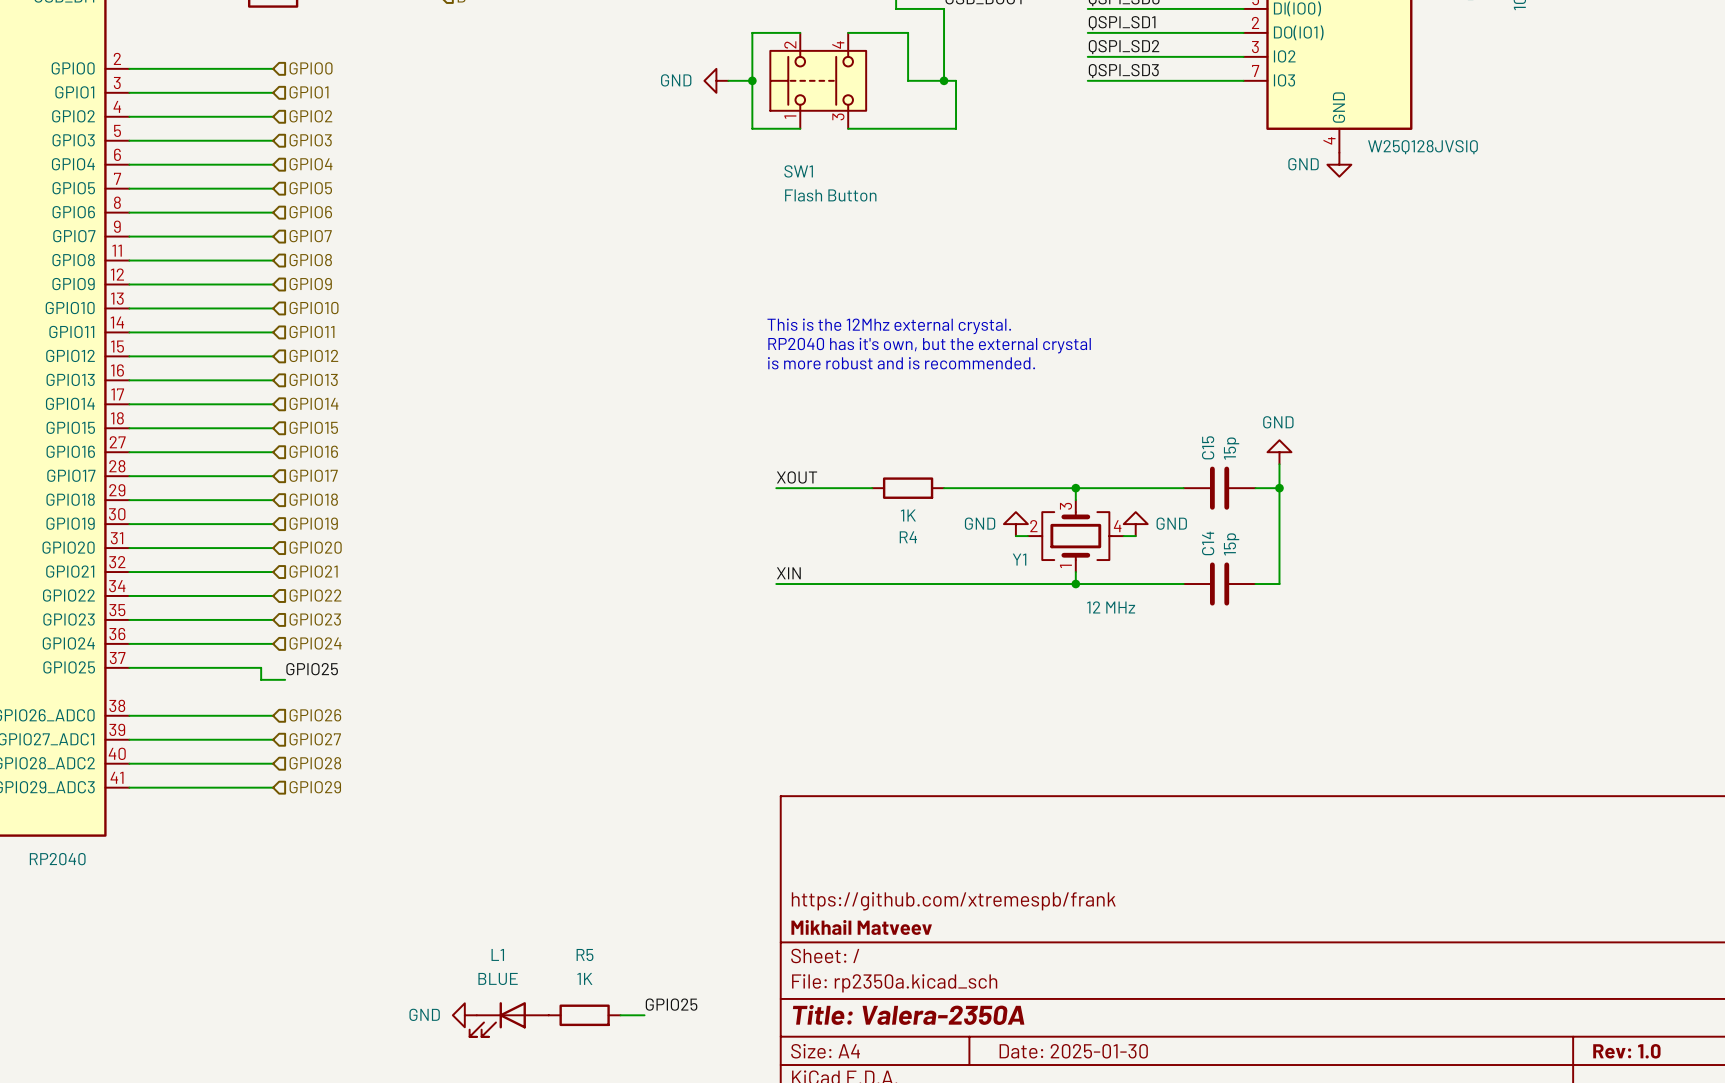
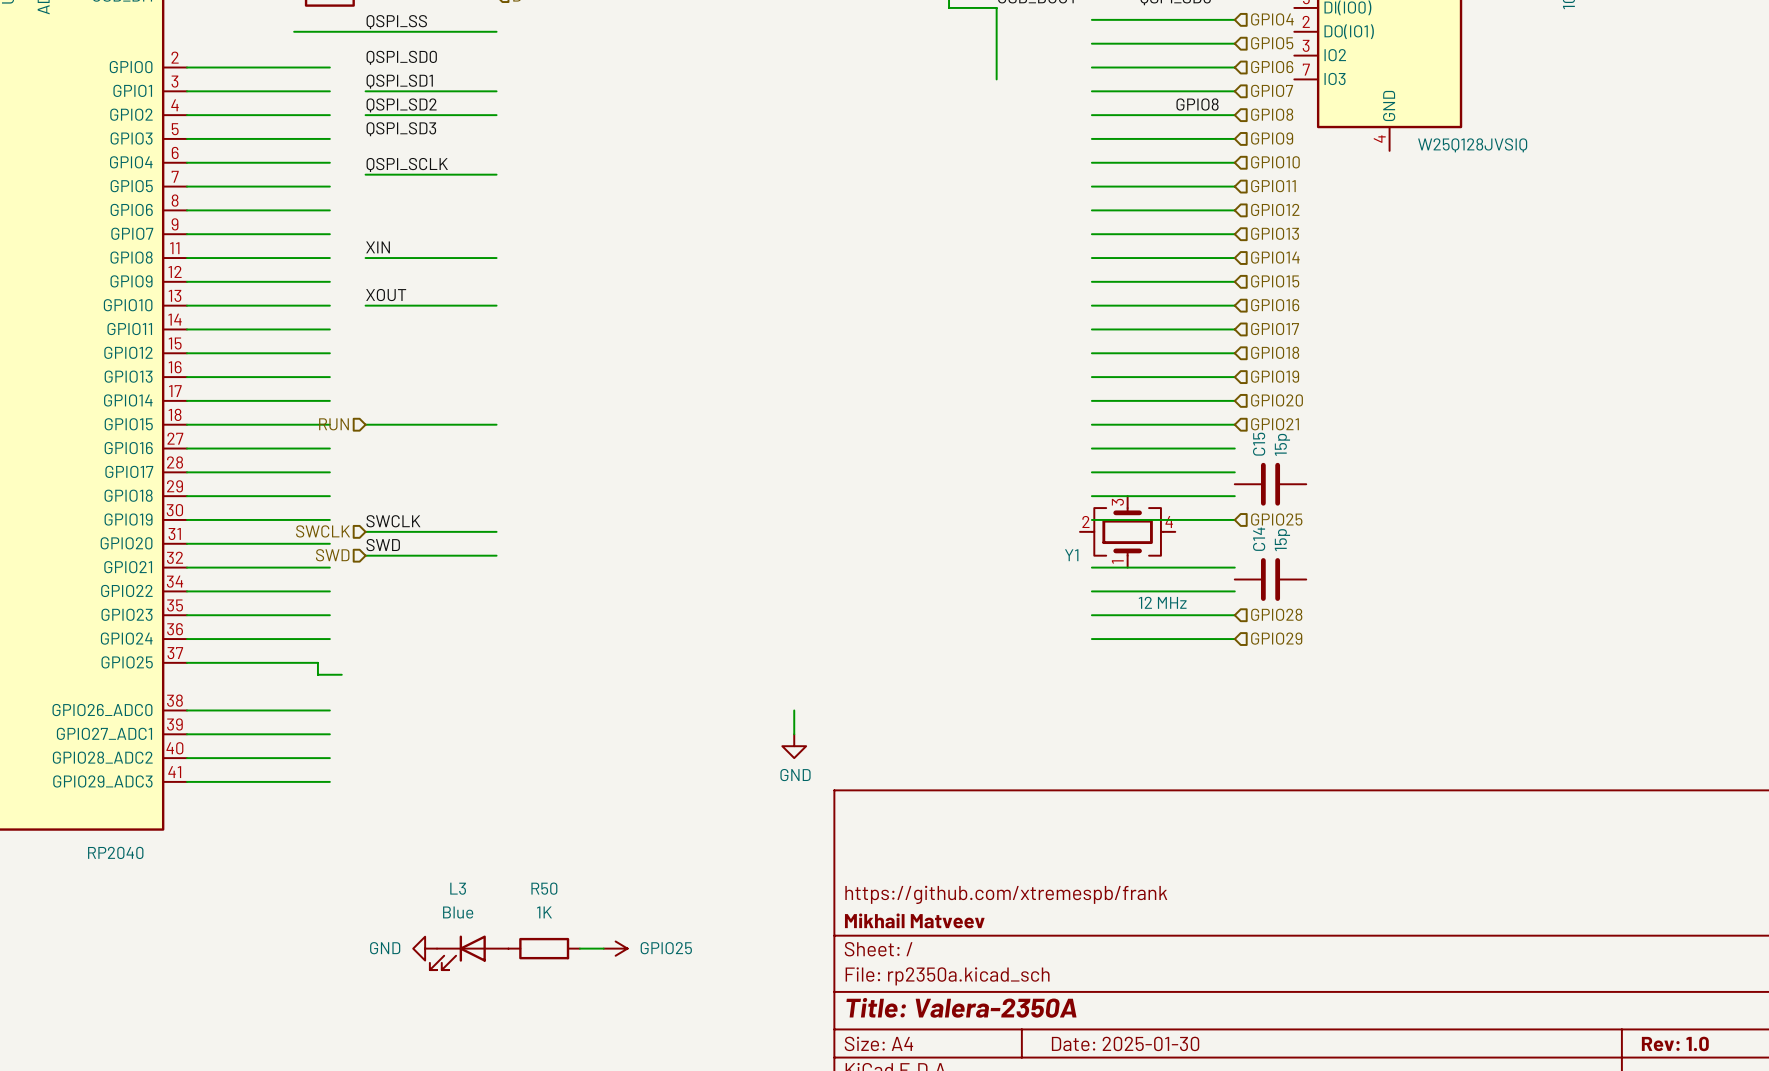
wire: (1087, 8) (1243, 8) -> none
wire: none -> (1091, 19) (1234, 19)
hierarchical label: none -> GPIO4 (1272, 19)
label: none -> QSPI_SS (396, 22)
label: QSPI_SD1 (1122, 23) -> none
wire: none -> (294, 31) (496, 31)
wire: (800, 32) (752, 32) (752, 128) (800, 128) -> none
wire: (848, 32) (908, 32) (908, 80) (956, 80) (956, 128) (848, 128) -> none
wire: (1087, 32) (1243, 32) -> none
wire: none -> (1091, 43) (1234, 43)
hierarchical label: none -> GPIO5 (1272, 43)
label: QSPI_SD2 (1124, 47) -> none
wire: (1087, 56) (1243, 56) -> none
label: none -> QSPI_SD0 (401, 57)
hierarchical label: GPIO0 (311, 68) -> none
wire: none -> (1091, 67) (1234, 67)
hierarchical label: none -> GPIO6 (1272, 67)
label: QSPI_SD3 (1123, 71) -> none
power symbol: GND (716, 80) -> none
wire: (728, 80) (752, 80) -> none
junction: (752, 80) -> none
SW1: Flash Button (818, 80) -> none
junction: (944, 80) -> none
wire: (1087, 80) (1243, 80) -> none
label: none -> QSPI_SD1 (399, 81)
wire: none -> (365, 91) (496, 91)
hierarchical label: GPIO1 (309, 92) -> none
wire: none -> (1091, 91) (1234, 91)
hierarchical label: none -> GPIO7 (1272, 90)
label: none -> GPIO8 (1197, 104)
label: none -> QSPI_SD2 (401, 105)
wire: none -> (365, 115) (496, 115)
hierarchical label: GPIO2 (310, 116) -> none
wire: none -> (1091, 115) (1234, 115)
hierarchical label: none -> GPIO8 (1272, 114)
label: none -> QSPI_SD3 (401, 129)
hierarchical label: GPIO3 (310, 140) -> none
wire: none -> (1091, 138) (1234, 138)
hierarchical label: none -> GPIO9 (1272, 138)
hierarchical label: GPIO4 (311, 164) -> none
wire: none -> (1091, 162) (1234, 162)
hierarchical label: none -> GPIO10 (1275, 162)
power symbol: GND (1339, 164) -> none
label: none -> QSPI_SCLK (407, 164)
wire: none -> (365, 174) (496, 174)
hierarchical label: GPIO5 (310, 188) -> none
wire: none -> (1091, 186) (1234, 186)
hierarchical label: none -> GPIO11 (1273, 186)
hierarchical label: GPIO6 (310, 212) -> none
wire: none -> (1091, 210) (1234, 210)
hierarchical label: none -> GPIO12 (1275, 209)
hierarchical label: GPIO7 (310, 236) -> none
wire: none -> (1091, 234) (1234, 234)
hierarchical label: none -> GPIO13 (1275, 233)
label: none -> XIN (378, 247)
wire: none -> (365, 258) (496, 258)
hierarchical label: GPIO8 (310, 260) -> none
wire: none -> (1091, 258) (1234, 258)
hierarchical label: none -> GPIO14 (1275, 257)
hierarchical label: GPIO9 (310, 284) -> none
wire: none -> (1091, 281) (1234, 281)
hierarchical label: none -> GPIO15 (1275, 281)
label: none -> XOUT (386, 295)
wire: none -> (365, 305) (496, 305)
hierarchical label: GPIO10 (314, 308) -> none
wire: none -> (1091, 305) (1234, 305)
hierarchical label: none -> GPIO16 (1275, 305)
text: This is the 12Mhz external crystal. (889, 326) -> none
hierarchical label: GPIO11 (312, 331) -> none
hierarchical label: none -> GPIO17 (1275, 329)
wire: none -> (1091, 329) (1234, 329)
text: RP2040 has it's own, but the external crystal (929, 345) -> none
hierarchical label: GPIO12 (313, 355) -> none
hierarchical label: none -> GPIO18 (1275, 352)
wire: none -> (1091, 353) (1234, 353)
text: is more robust and is recommended. (901, 363) -> none
hierarchical label: GPIO13 (313, 379) -> none
hierarchical label: none -> GPIO19 (1275, 376)
wire: none -> (1091, 377) (1234, 377)
hierarchical label: GPIO14 (314, 403) -> none
hierarchical label: none -> GPIO20 (1277, 400)
wire: none -> (1091, 400) (1234, 400)
hierarchical label: GPIO15 (313, 427) -> RUN (334, 424)
hierarchical label: none -> GPIO21 (1275, 424)
wire: none -> (365, 424) (496, 424)
wire: none -> (1091, 424) (1234, 424)
hierarchical label: GPIO16 (313, 451) -> none
wire: none -> (1091, 448) (1234, 448)
power symbol: GND (1279, 452) -> none
wire: (1279, 464) (1279, 584) (1255, 584) -> none
hierarchical label: GPIO17 (313, 475) -> none
wire: none -> (1091, 472) (1234, 472)
label: XOUT (797, 477) -> none
wire: (776, 488) (872, 488) -> none
R4: 1K (908, 488) -> none
wire: (944, 488) (1183, 488) -> none
wire: (1075, 488) (1075, 500) -> none
junction: (1075, 488) -> none
wire: (1255, 488) (1279, 488) -> none
junction: (1279, 488) -> none
hierarchical label: GPIO18 (313, 499) -> none
wire: none -> (1091, 496) (1234, 496)
hierarchical label: GPIO19 (313, 523) -> none
hierarchical label: none -> GPIO25 (1276, 519)
power symbol: GND (1015, 524) -> none
wire: none -> (1091, 519) (1234, 519)
power symbol: GND (1135, 524) -> none
label: none -> SWCLK (393, 521)
hierarchical label: none -> SWCLK (323, 531)
wire: none -> (365, 531) (496, 531)
wire: (1015, 536) (1027, 536) -> none
wire: (1123, 536) (1135, 536) -> none
hierarchical label: GPIO20 (315, 547) -> none
label: none -> SWD (383, 545)
hierarchical label: none -> SWD (332, 555)
wire: none -> (365, 555) (496, 555)
hierarchical label: GPIO21 (313, 571) -> none
wire: none -> (1091, 567) (1234, 567)
wire: (1075, 572) (1075, 584) -> none
label: XIN (788, 573) -> none
wire: (776, 584) (1183, 584) -> none
junction: (1075, 584) -> none
hierarchical label: GPIO22 (315, 595) -> none
wire: none -> (1091, 591) (1234, 591)
hierarchical label: GPIO23 (315, 619) -> none
wire: none -> (1091, 615) (1234, 615)
hierarchical label: none -> GPIO28 (1276, 614)
hierarchical label: GPIO24 (315, 643) -> none
wire: none -> (1091, 639) (1234, 639)
hierarchical label: none -> GPIO29 (1276, 638)
label: GPIO25 (312, 669) -> none
hierarchical label: GPIO26 (315, 715) -> none
wire: none -> (794, 710) (794, 734)
hierarchical label: GPIO27 (315, 739) -> none
power symbol: none -> GND (794, 746)
hierarchical label: GPIO28 (315, 763) -> none
hierarchical label: GPIO29 (315, 787) -> none
R50: none -> 1K (544, 948)
power symbol: none -> GPIO25 (615, 948)
L3: none -> Blue (469, 952)
label: GPIO25 (671, 1004) -> none
power symbol position: GND (464, 1015) -> GND (425, 948)
R5: 1K (584, 1015) -> none
wire: (620, 1015) (644, 1015) -> (579, 948) (603, 948)
L1: BLUE (509, 1019) -> none

